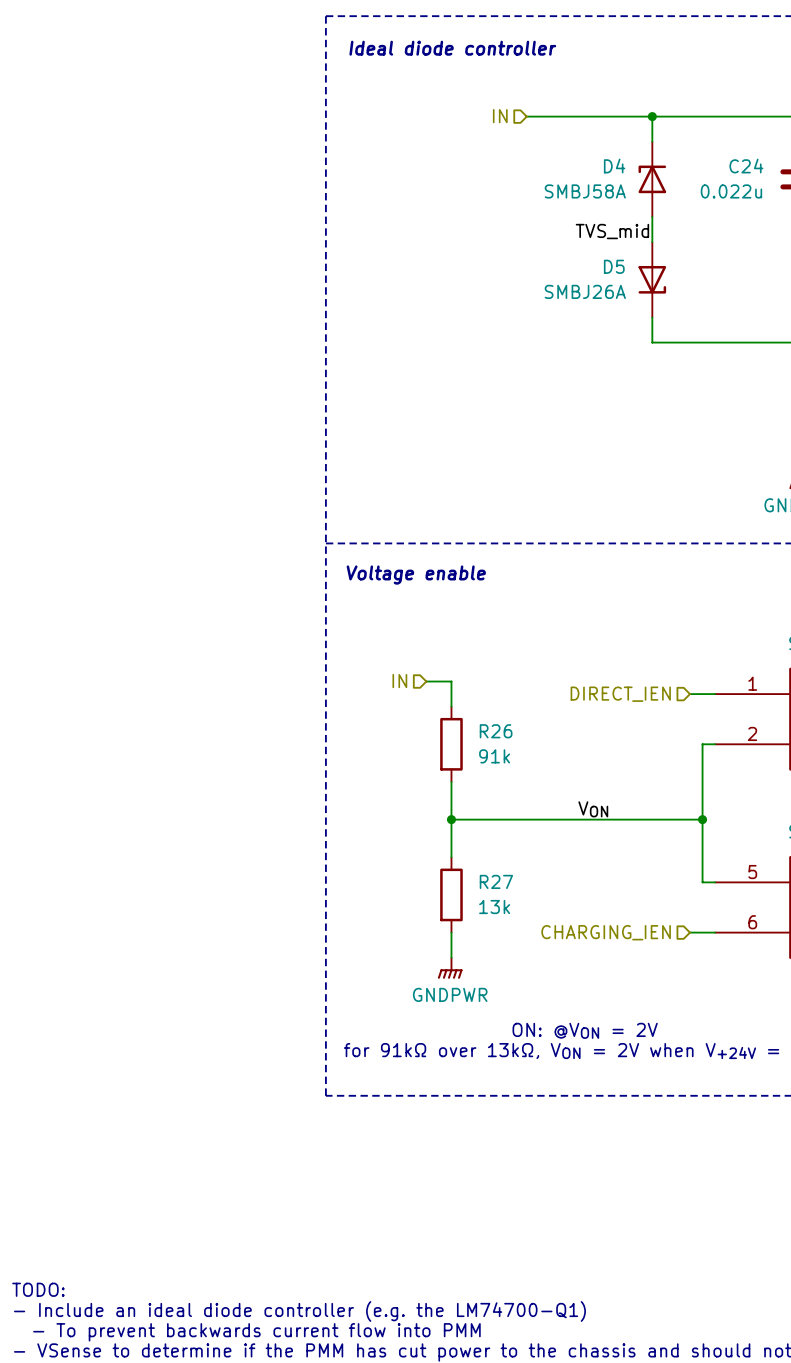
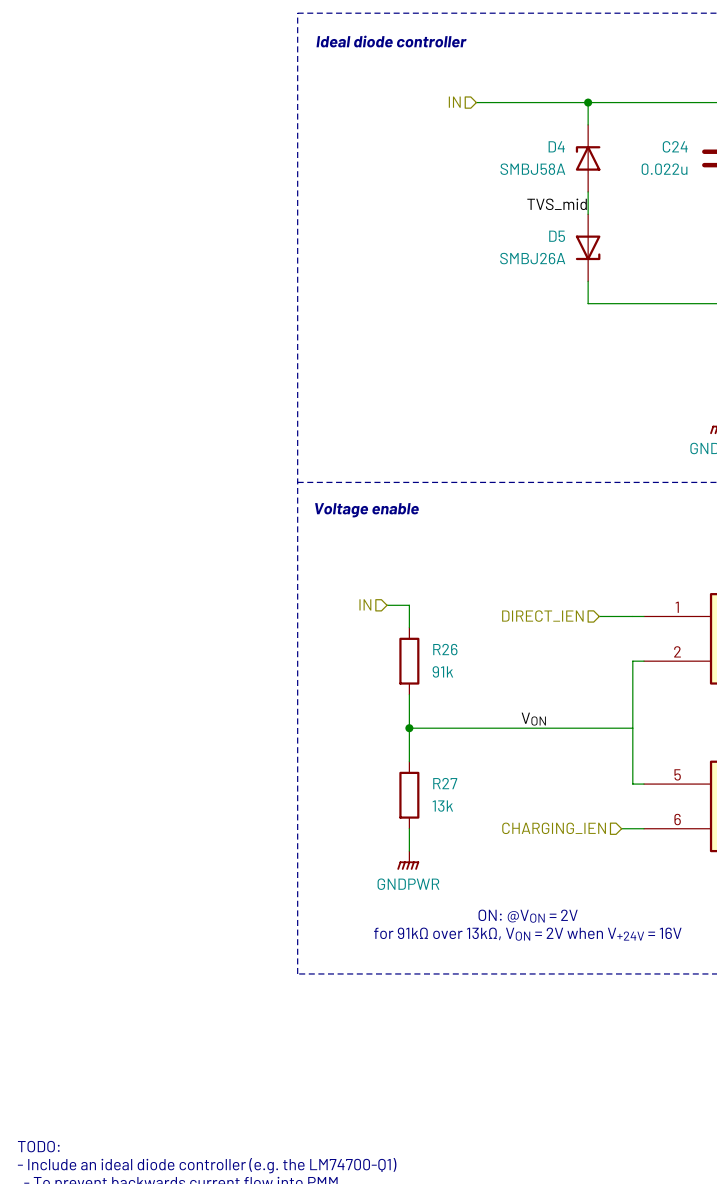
hierarchical label position: DIRECT_IEN (620, 694) -> DIRECT_IEN (542, 616)
wire: none -> (599, 616) (621, 616)
junction: (702, 819) -> none

